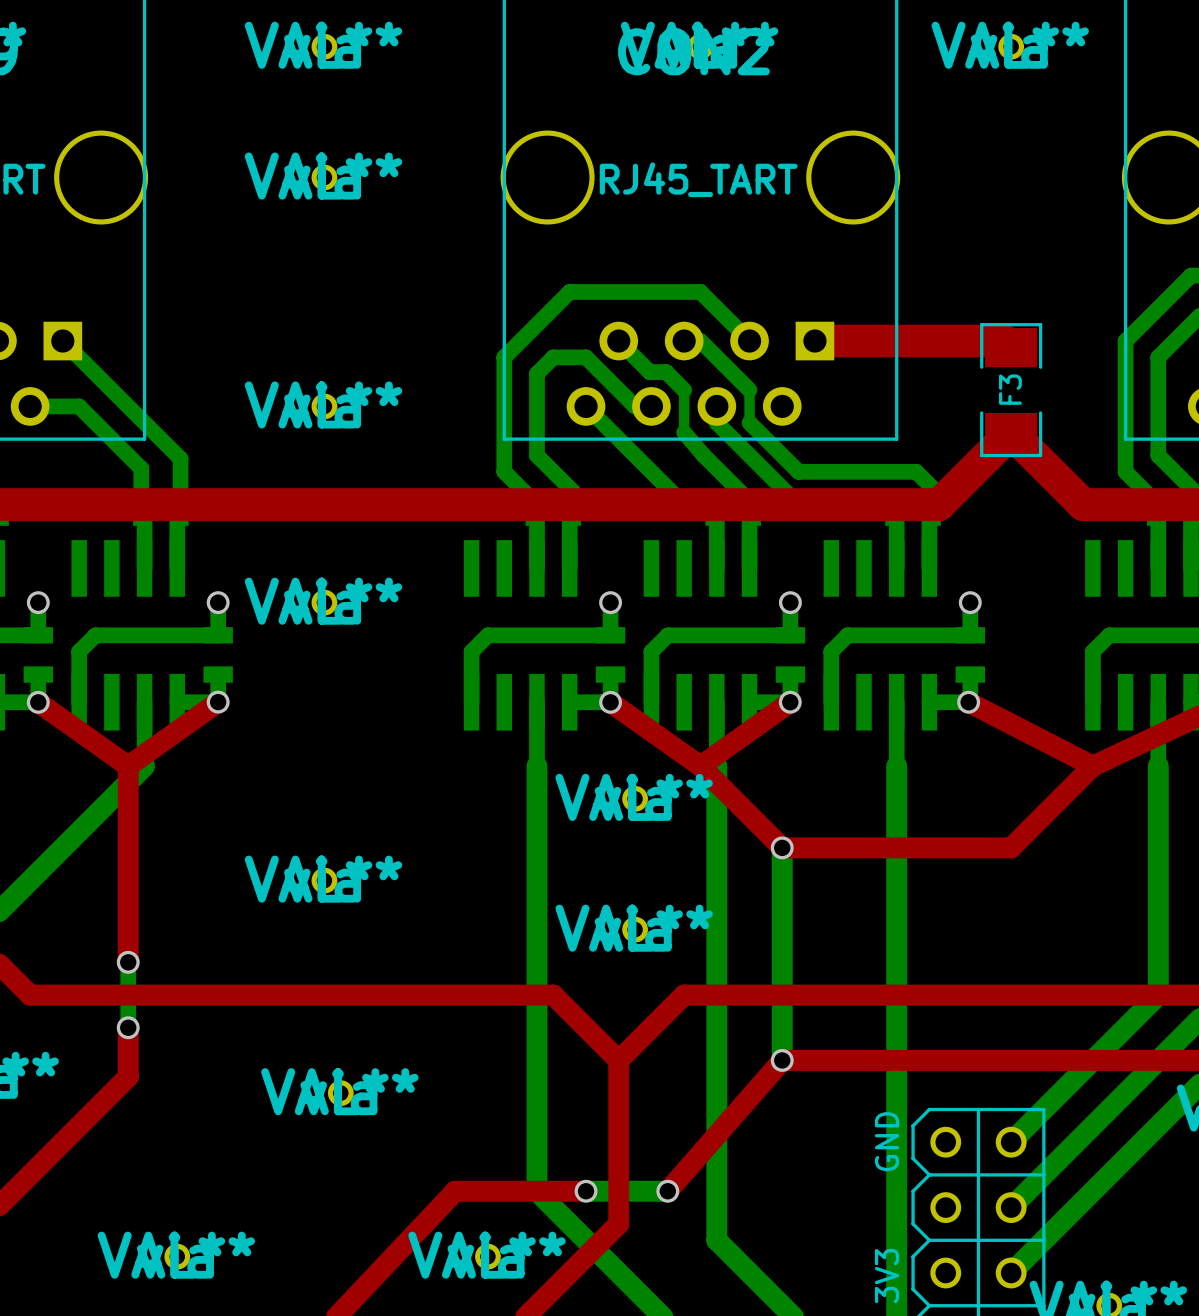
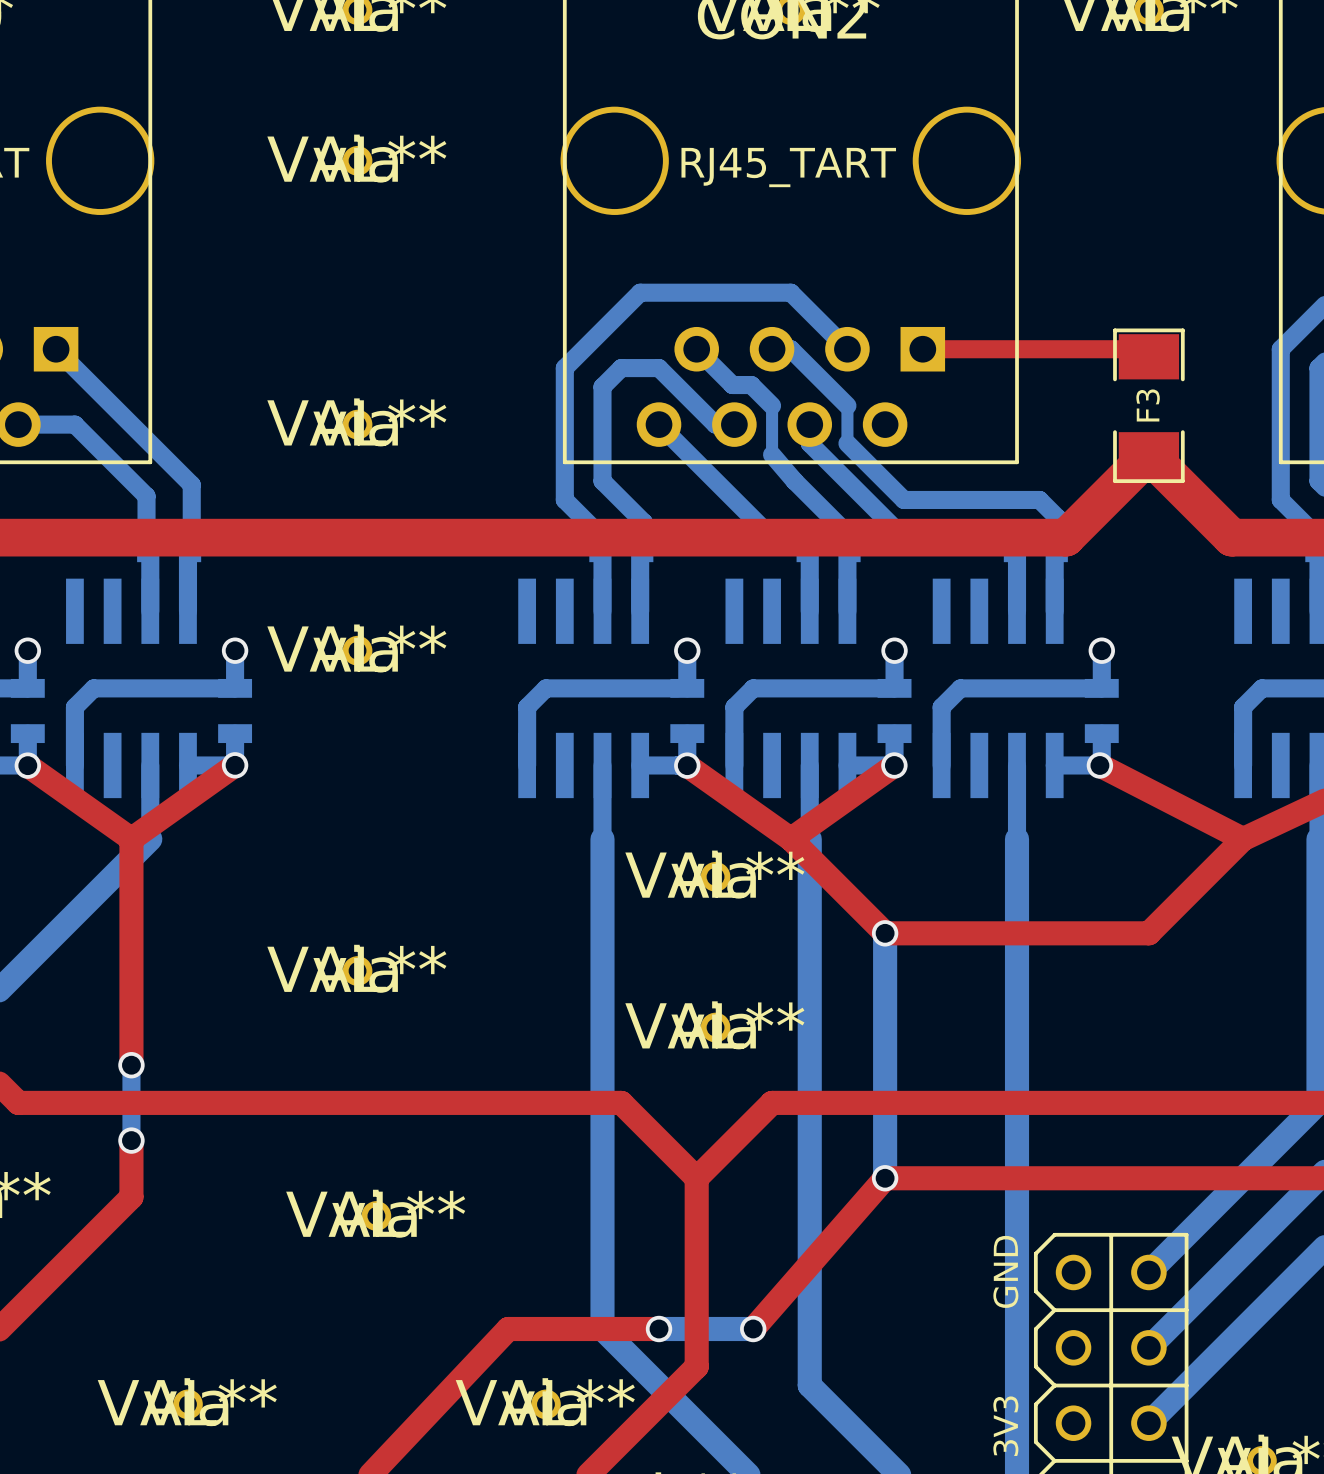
top track width: thick (814, 341) (1004, 341) -> thin (922, 349) (1141, 349)

